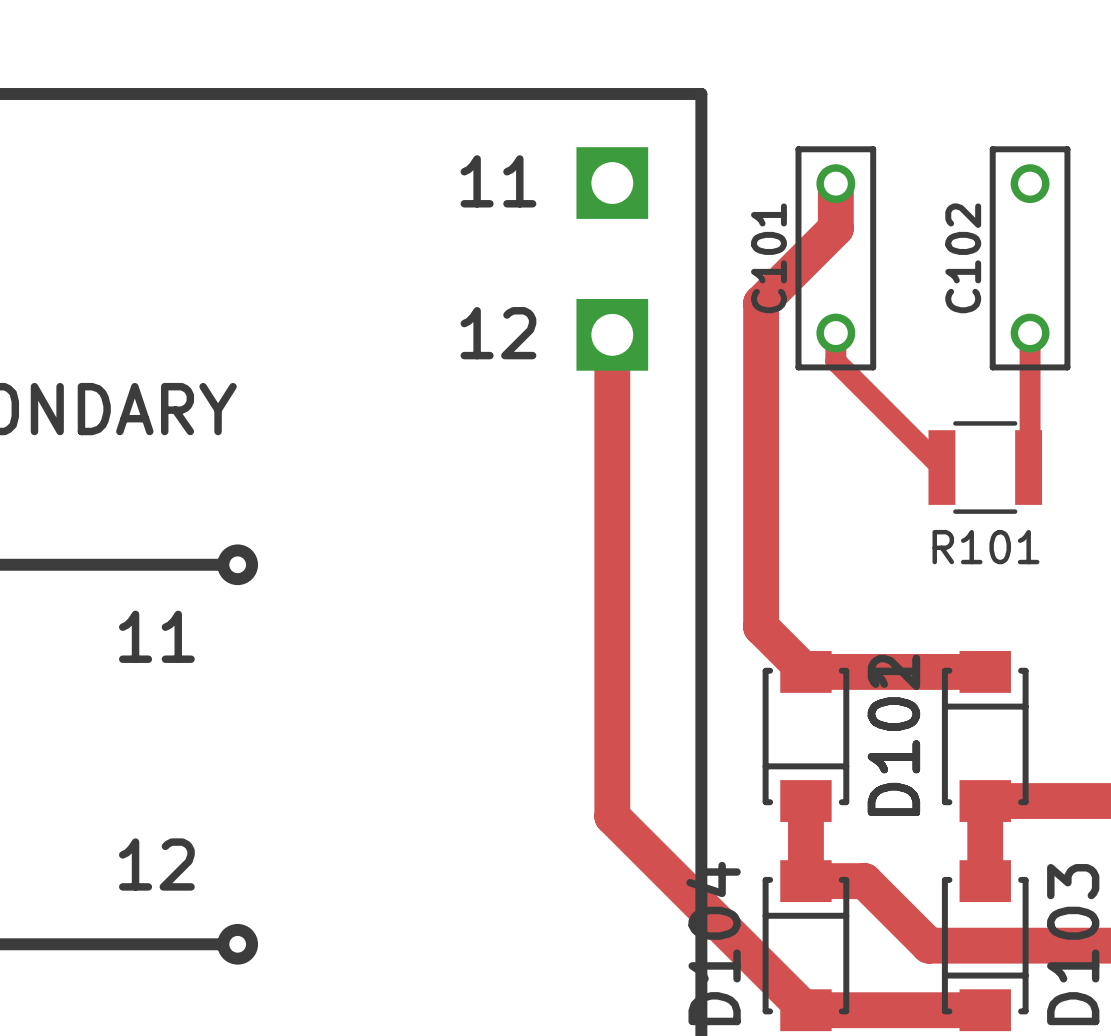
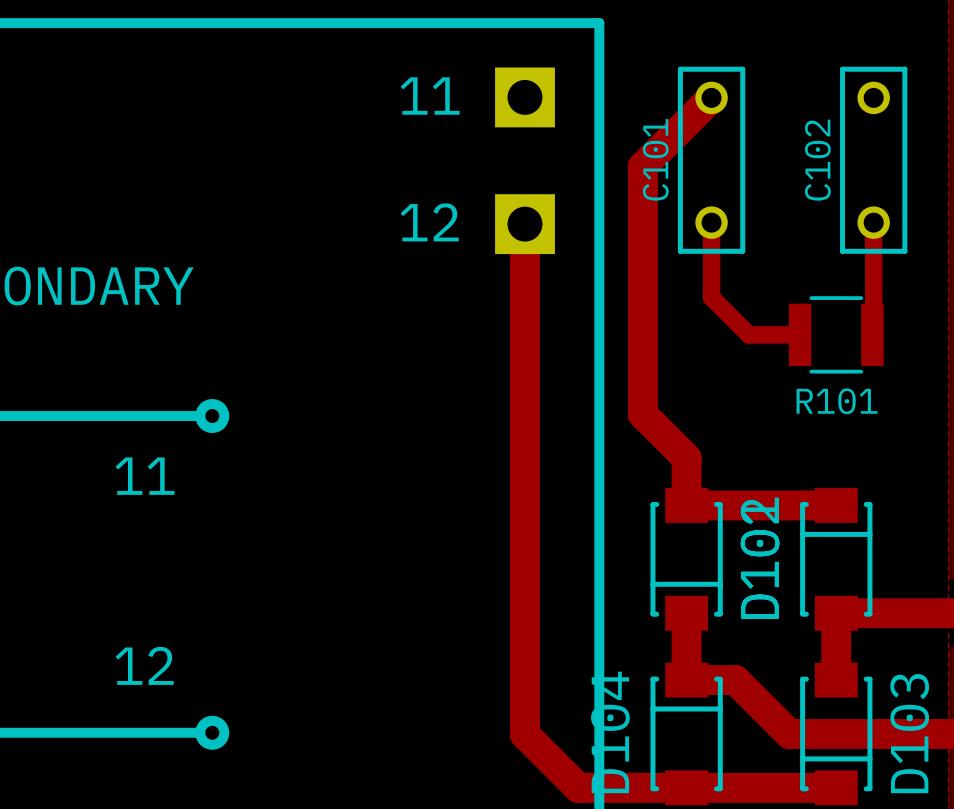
track: (835, 183) (835, 228) (761, 303) (761, 627) (805, 671) -> (711, 97) (642, 166) (642, 414) (686, 458) (686, 505)
track: (835, 361) (941, 467) -> (711, 246) (711, 297) (748, 334) (800, 334)
track: (612, 816) (805, 1010) -> (524, 626) (524, 734) (578, 787) (686, 787)

